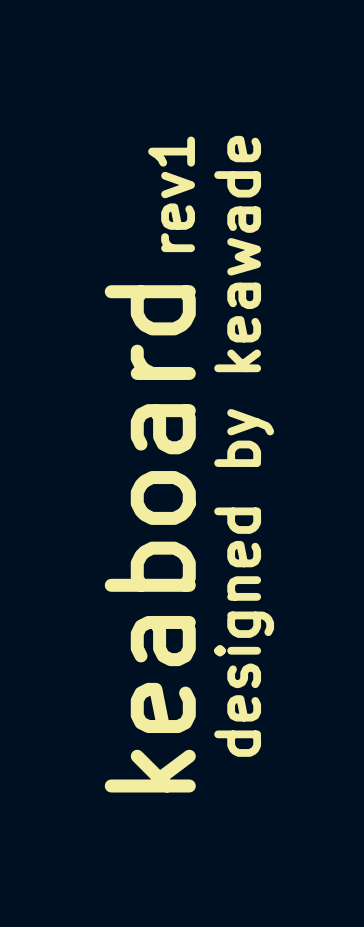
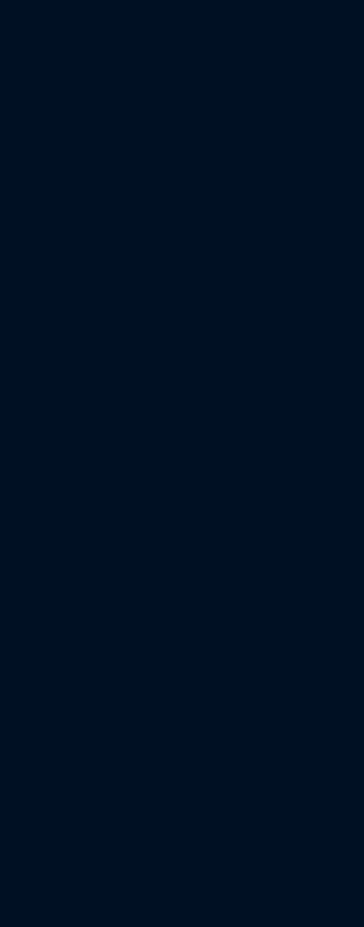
text: rev1 (171, 194) -> none
text: designed by keawade (244, 446) -> none
text: keaboard (150, 538) -> none

